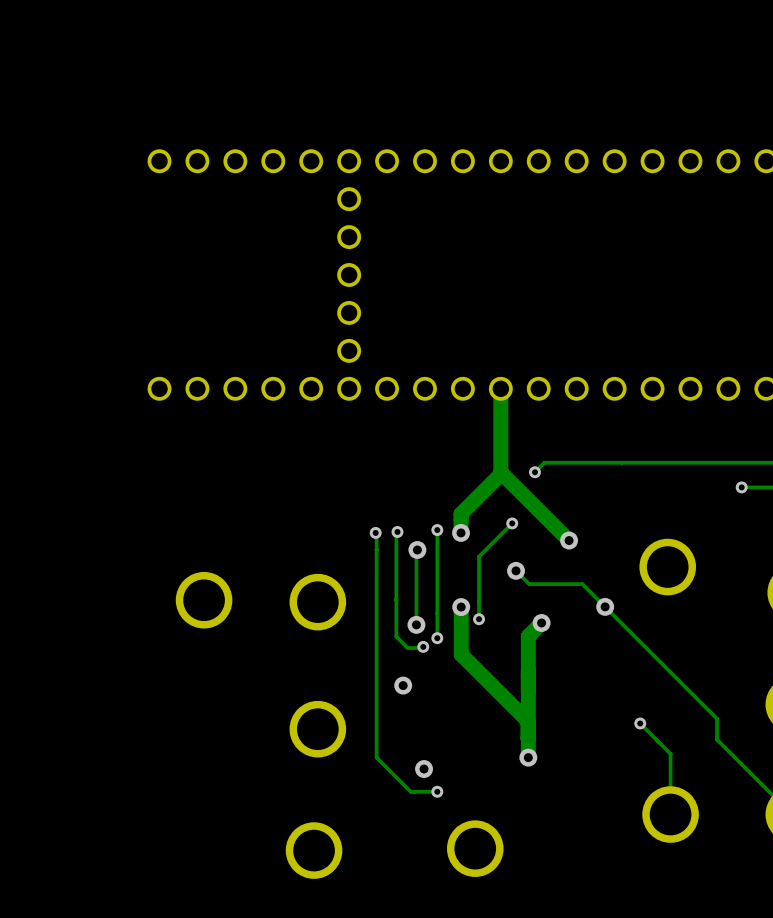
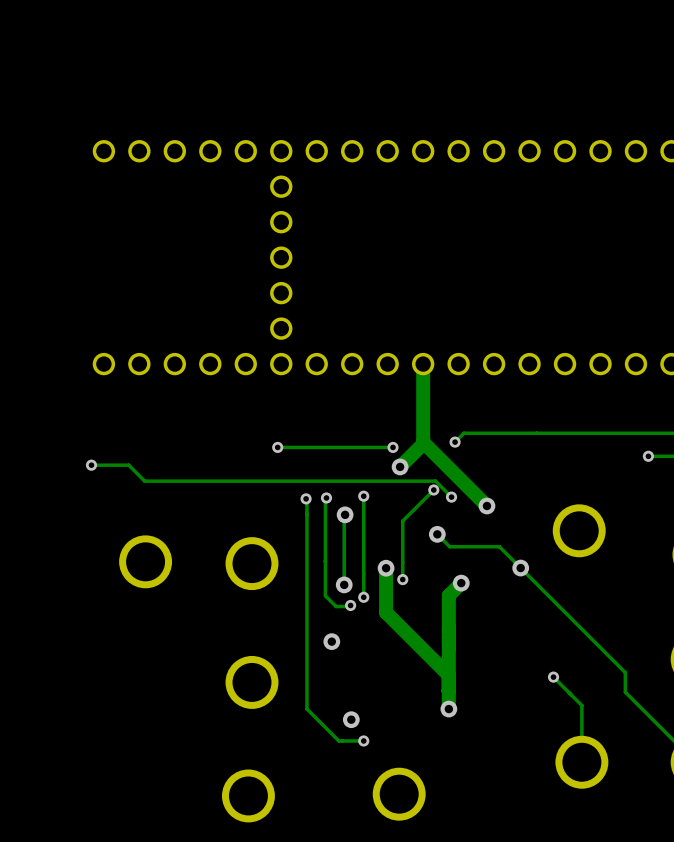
via: none -> (277, 447)
track: none -> (393, 447) (277, 447)
via: none -> (393, 447)
track: none -> (91, 465) (128, 465) (144, 481) (435, 481) (451, 497)
via: none -> (91, 465)
track: (476, 498) (461, 513) (461, 532) -> none
via: none -> (451, 497)
via position: (461, 532) -> (400, 466)

